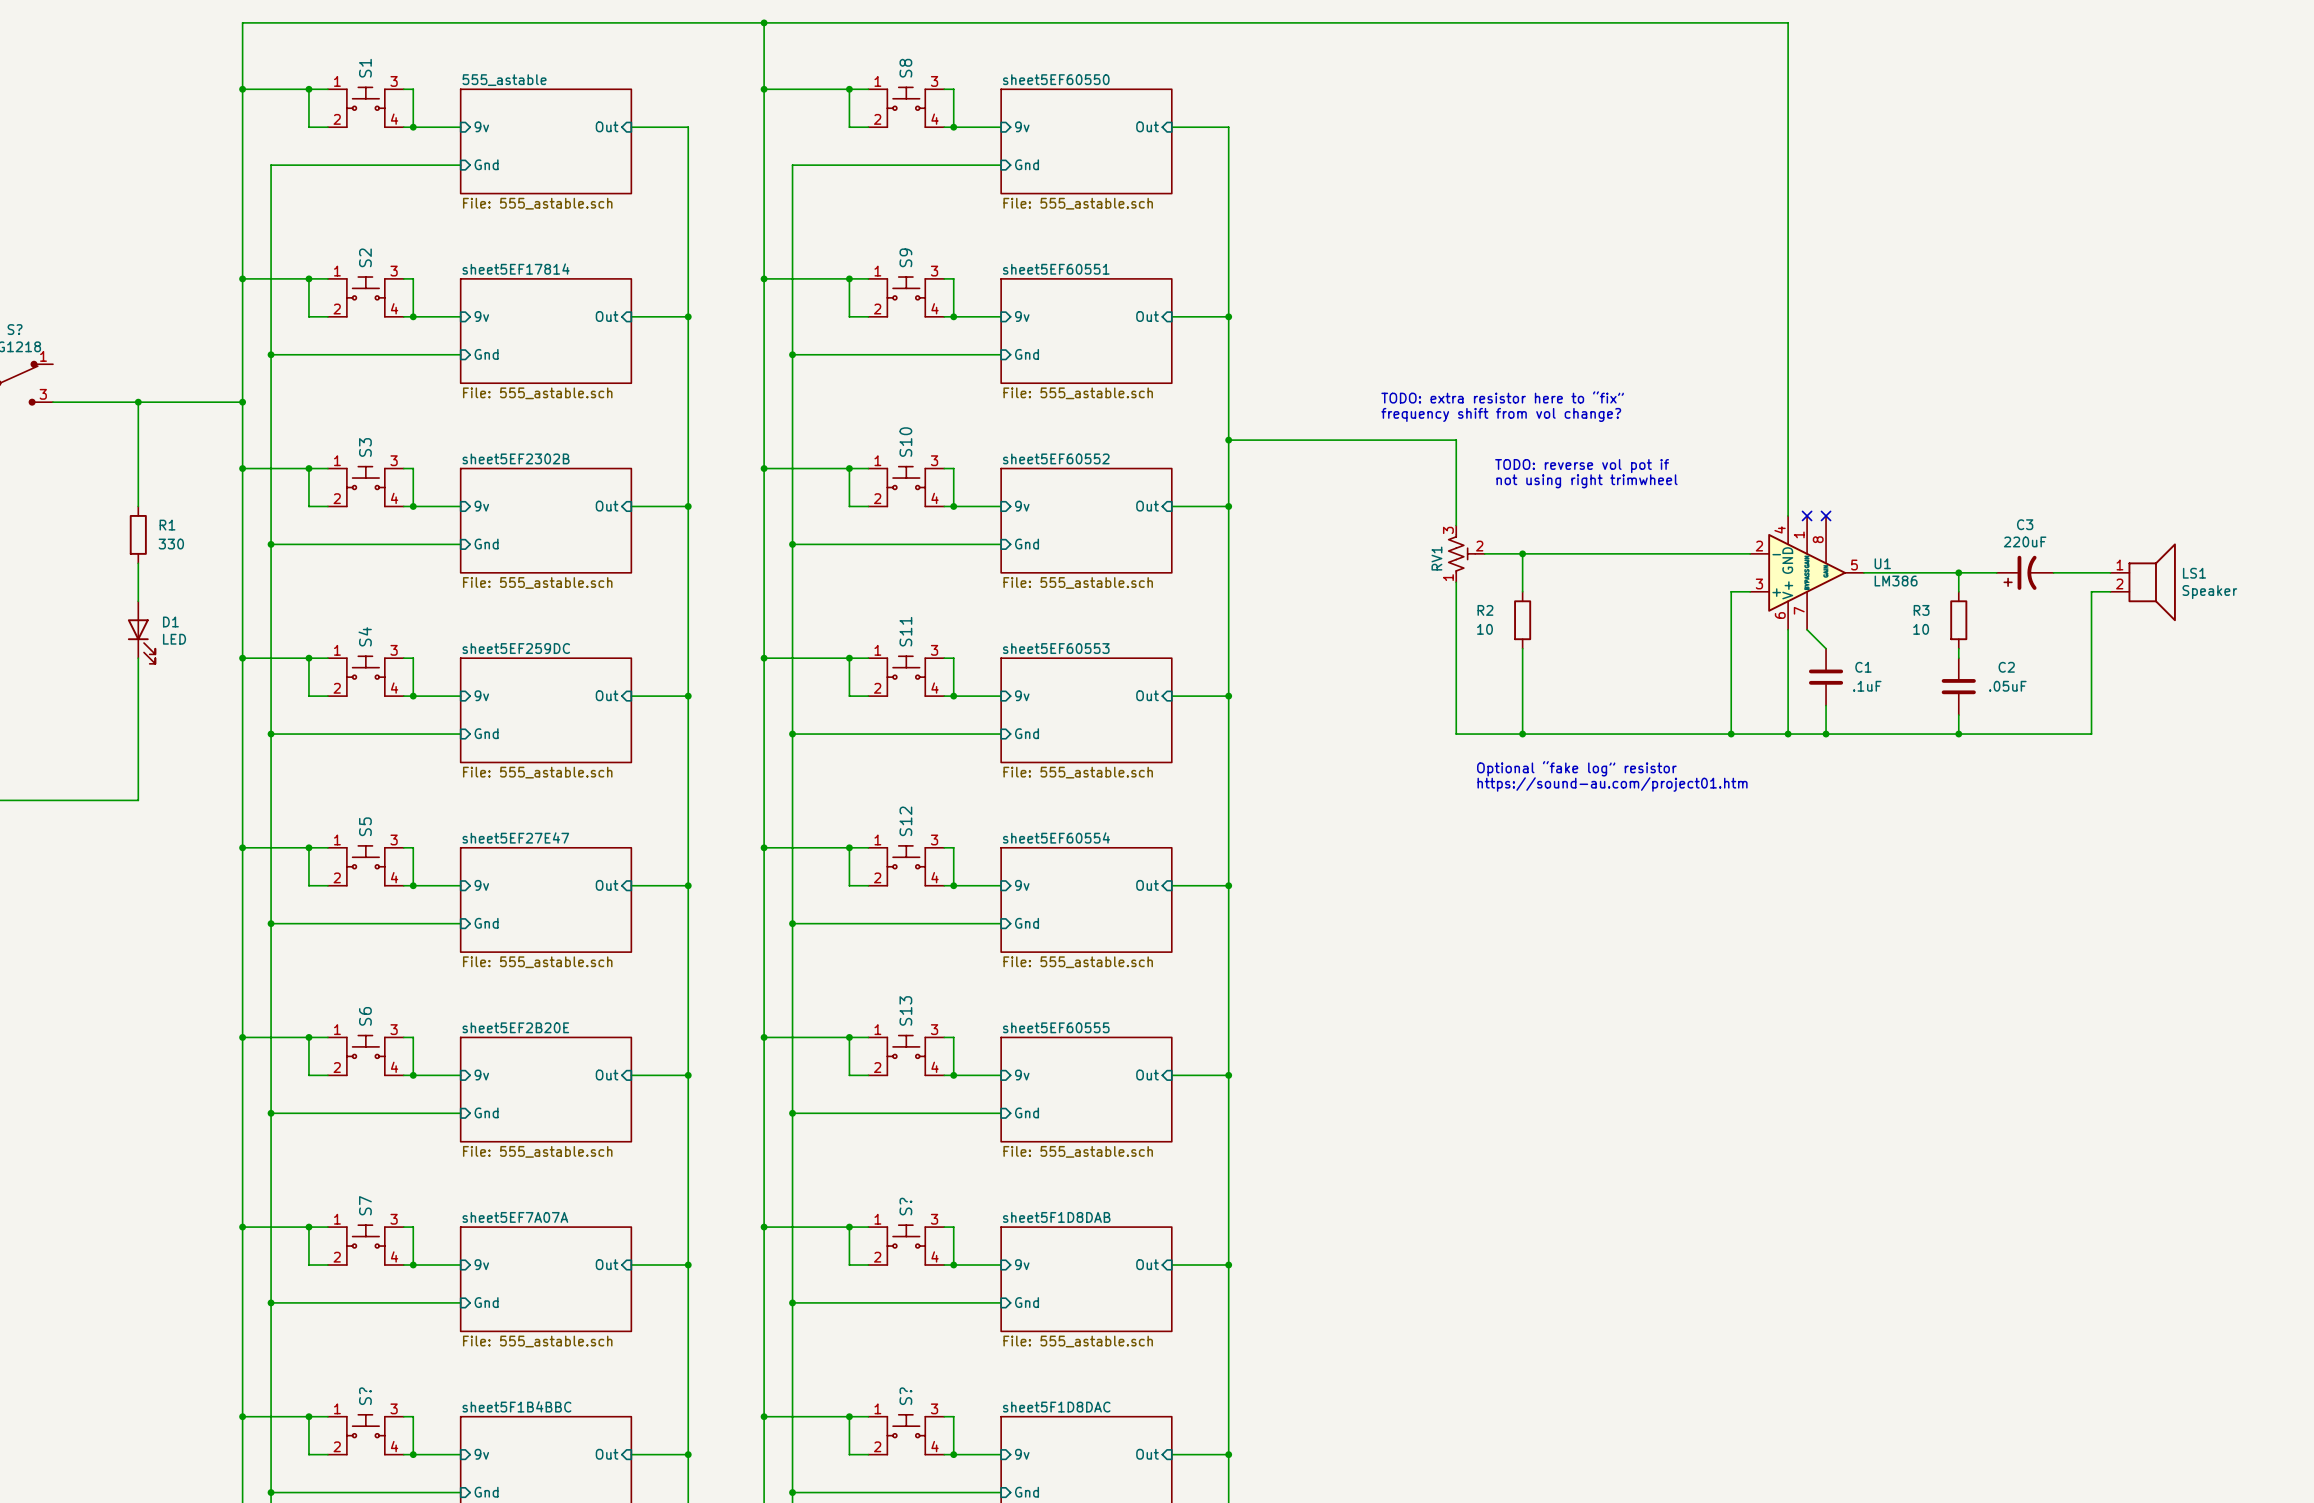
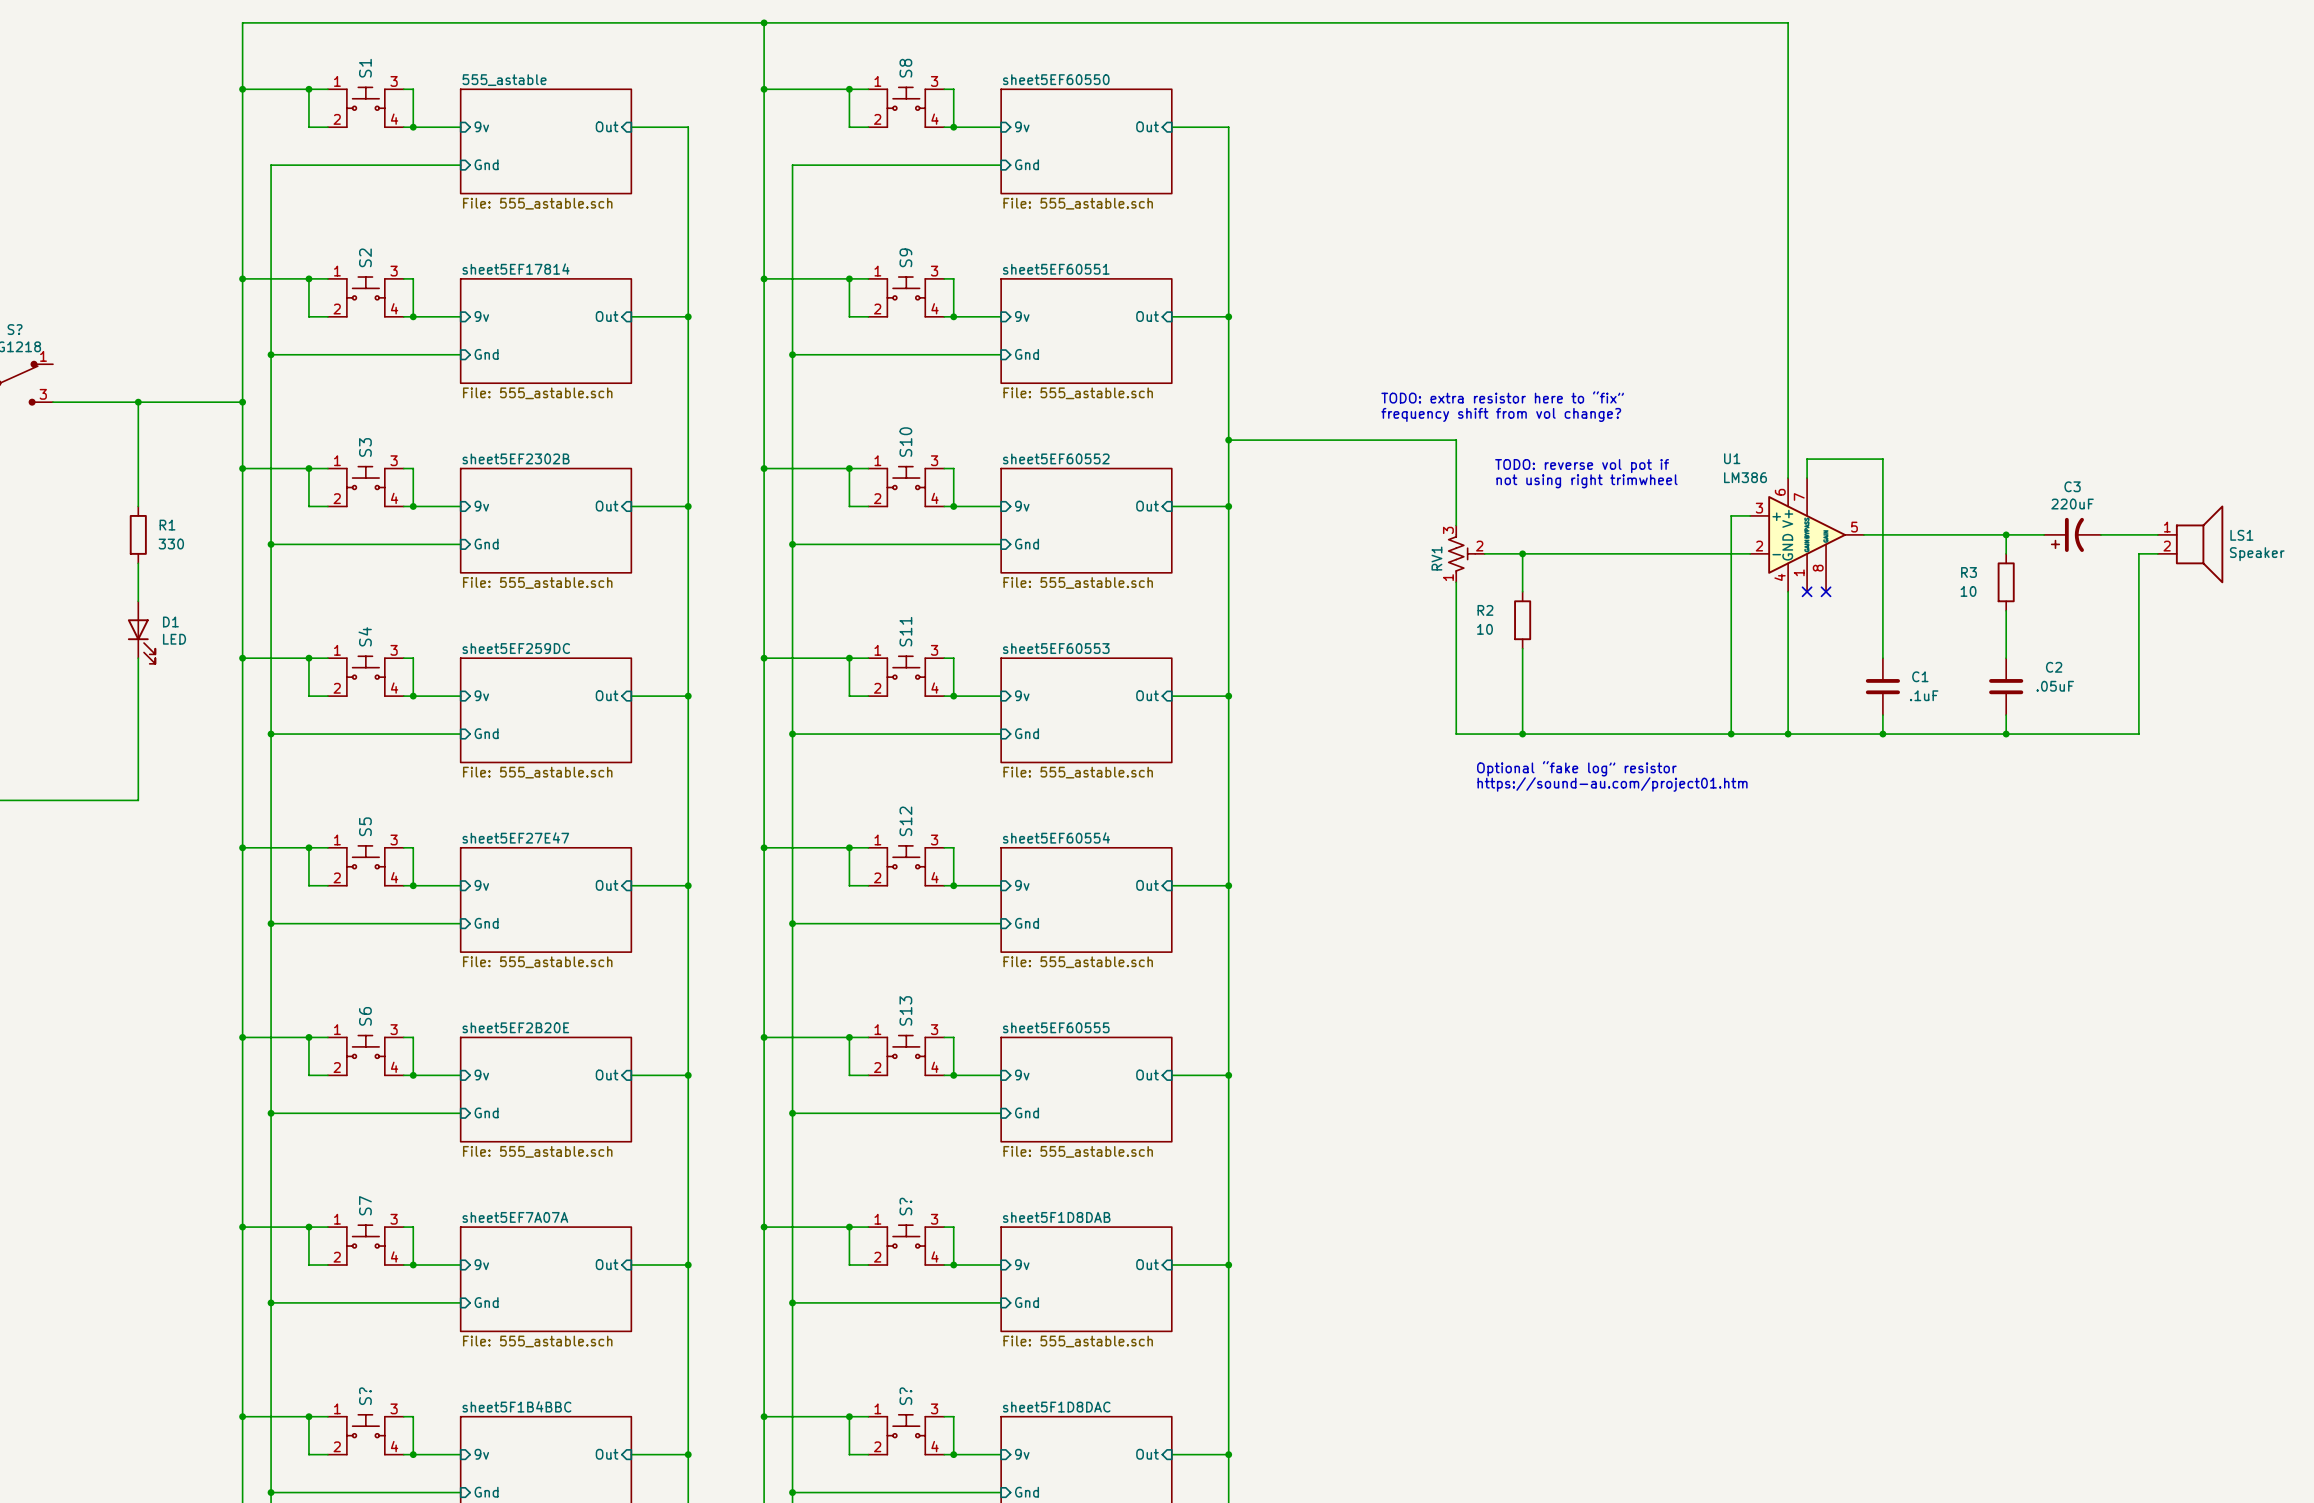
wire: none -> (1807, 478) (1807, 459) (1882, 459) (1882, 658)
no-connect mark: (1807, 515) -> none
no-connect mark: (1826, 515) -> none
wire: none -> (1863, 534) (2044, 534)
junction: none -> (2006, 534)
U1 name position: U1 (1882, 563) -> U1 (1732, 458)
U1 flip: as is (1807, 572) -> up-down (1807, 534)
wire: (1863, 572) (1996, 572) -> none
wire: (1958, 572) (1958, 591) -> (2006, 534) (2006, 553)
junction: (1958, 572) -> none
C3 position: (2025, 572) -> (2072, 534)
wire: (2053, 572) (2110, 572) -> (2101, 534) (2157, 534)
U1 value position: LM386 (1896, 581) -> LM386 (1745, 477)
LS1 position: (2143, 582) -> (2190, 544)
wire: (1731, 591) (1750, 591) -> (1731, 591) (1731, 515) (1750, 515)
no-connect mark: none -> (1807, 591)
no-connect mark: none -> (1826, 591)
wire: (2110, 591) (2091, 591) (2091, 734) -> (2157, 553) (2138, 553) (2138, 734) (2091, 734)
wire: none -> (2006, 610) (2006, 658)
R3 position: (1958, 620) -> (2006, 582)
wire: (1807, 629) (1826, 648) -> none
wire: (1958, 648) (1958, 658) -> none
C1 position: (1826, 677) -> (1882, 686)
C2 position: (1958, 686) -> (2006, 686)
wire: (1826, 705) (1826, 734) -> none
wire: none -> (1882, 715) (1882, 734)
wire: (1958, 715) (1958, 734) -> (2006, 715) (2006, 734)
junction: (1826, 734) -> none
junction: none -> (1882, 734)
junction: (1958, 734) -> none
junction: none -> (2006, 734)

